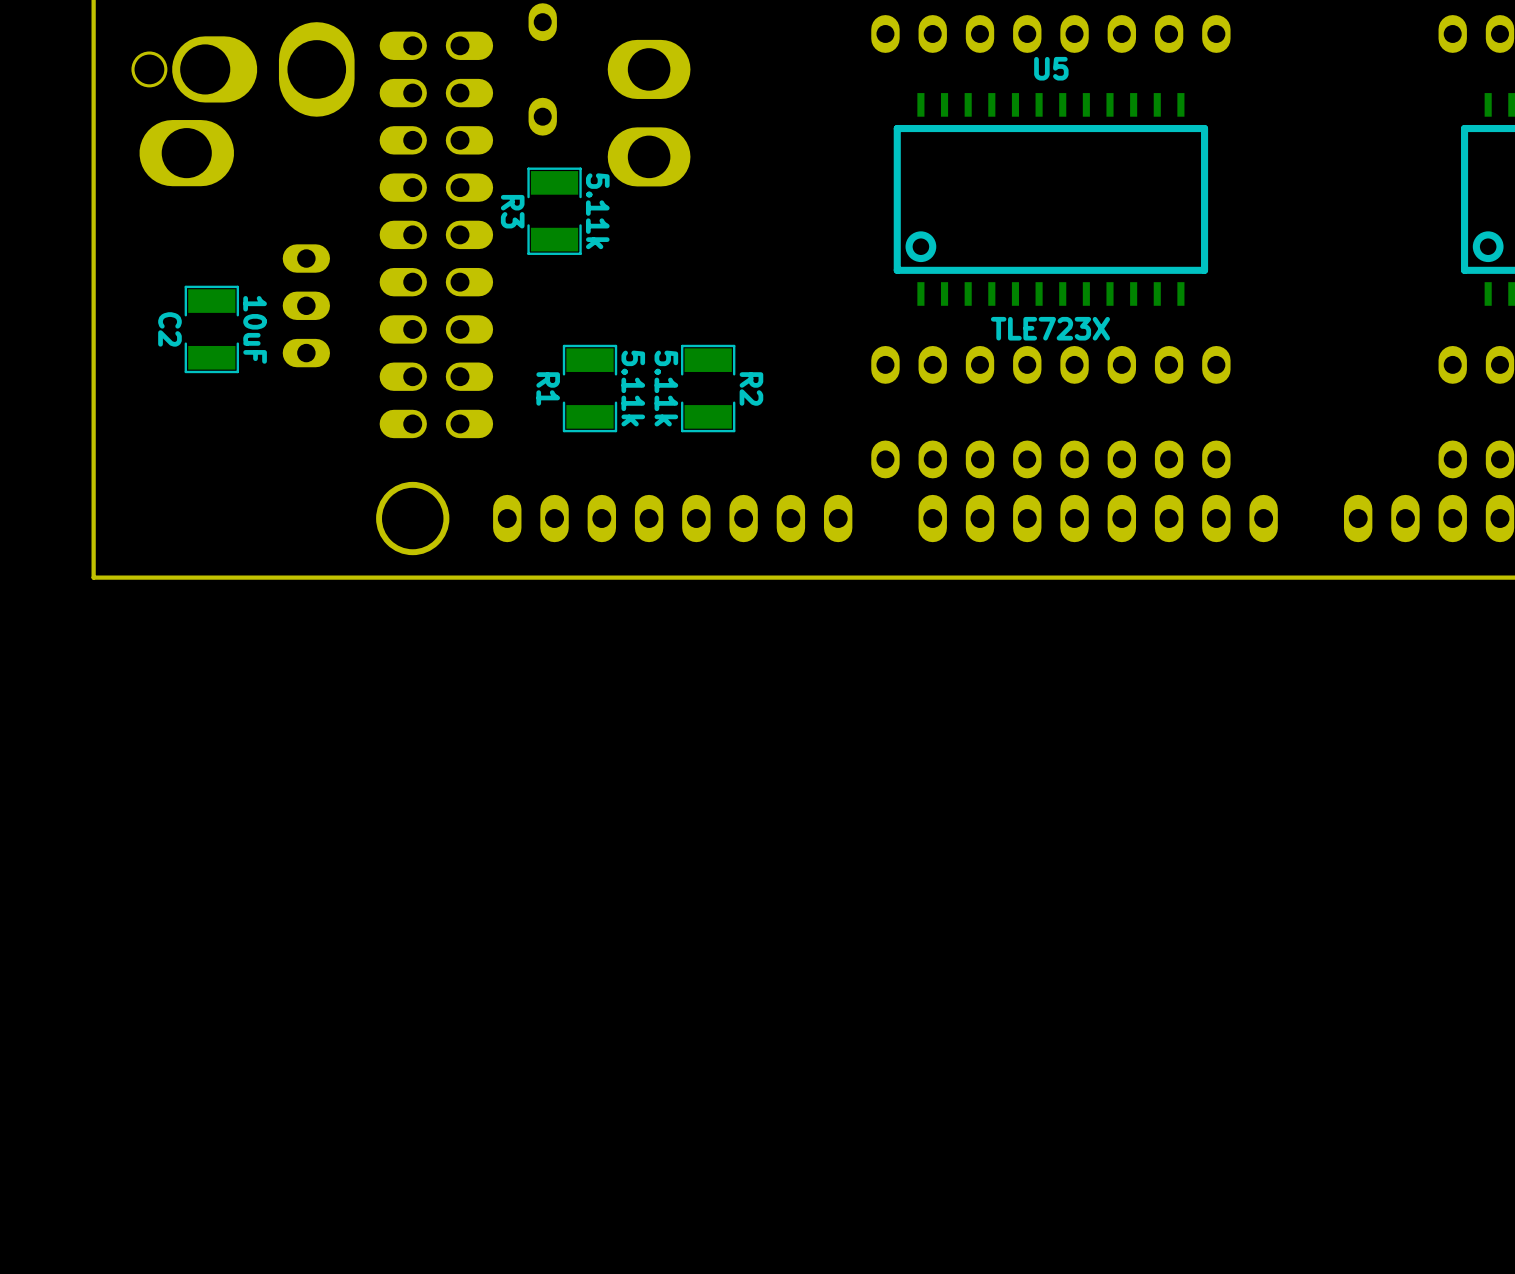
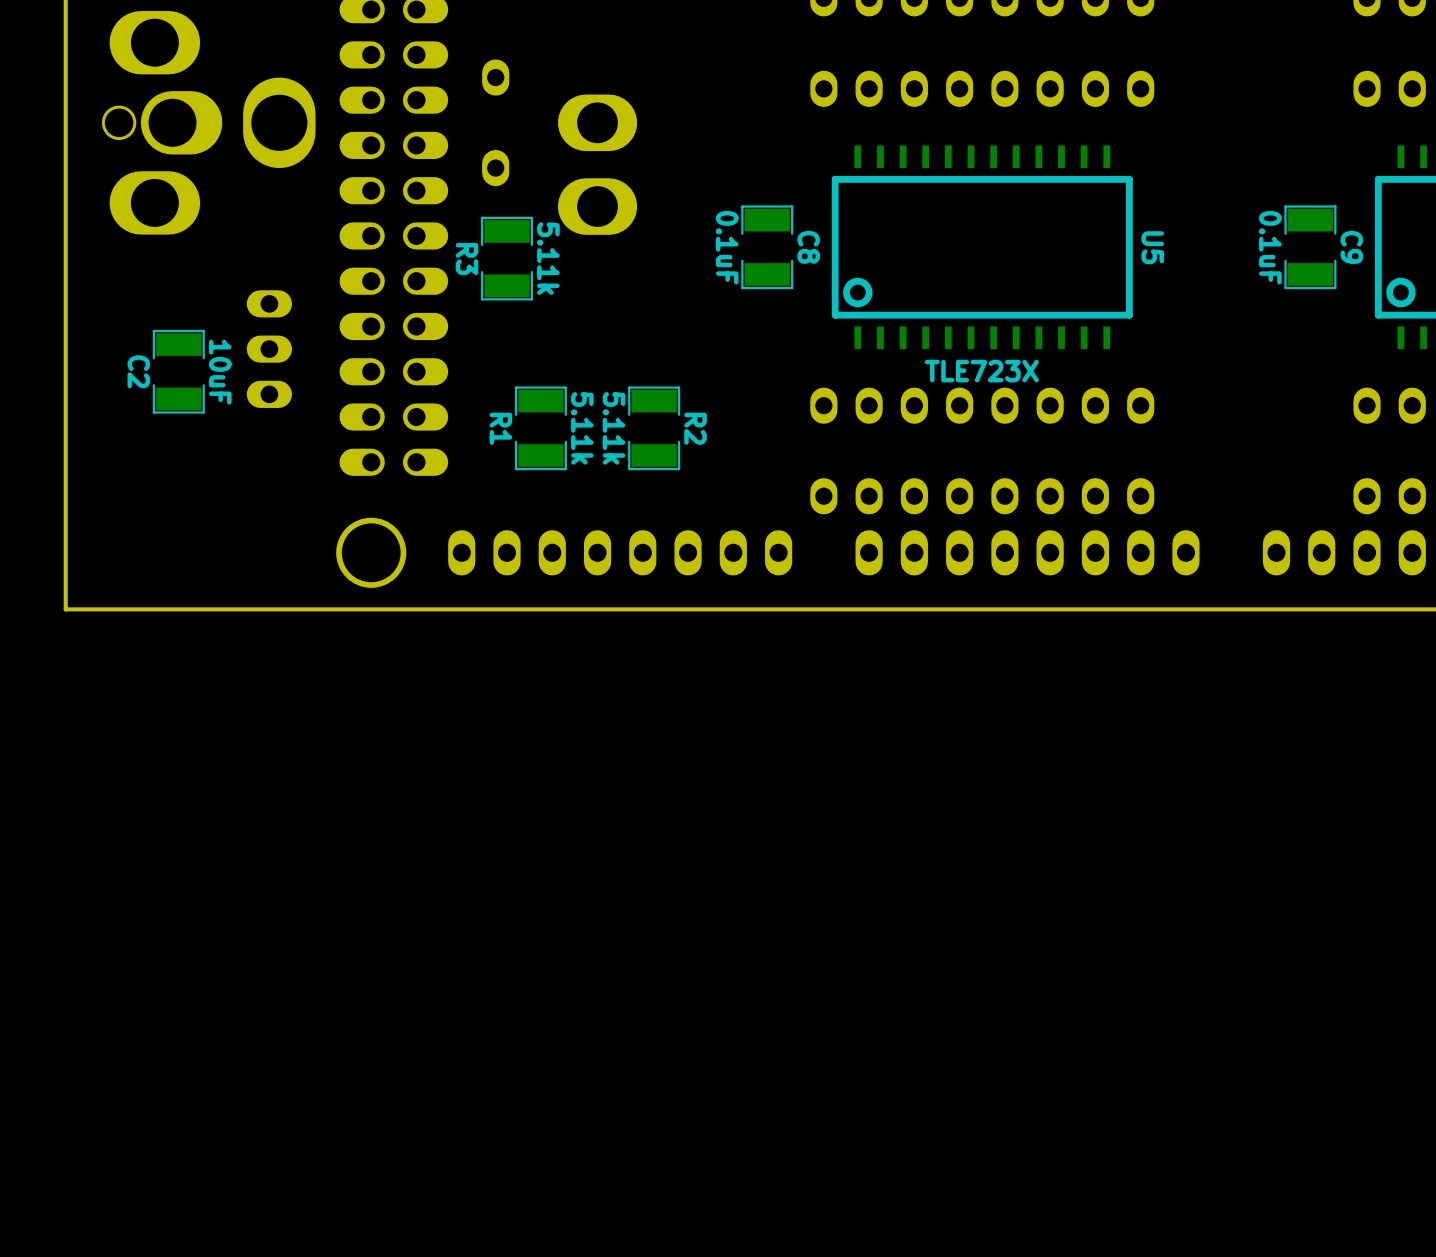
U5 name rotation: 0° (1051, 68) -> 90° clockwise (1152, 247)
U5 name position: U5 (1051, 68) -> U5 (1152, 247)
C8: none -> 0.1uF (767, 247)
C9: none -> 0.1uF (1310, 247)

